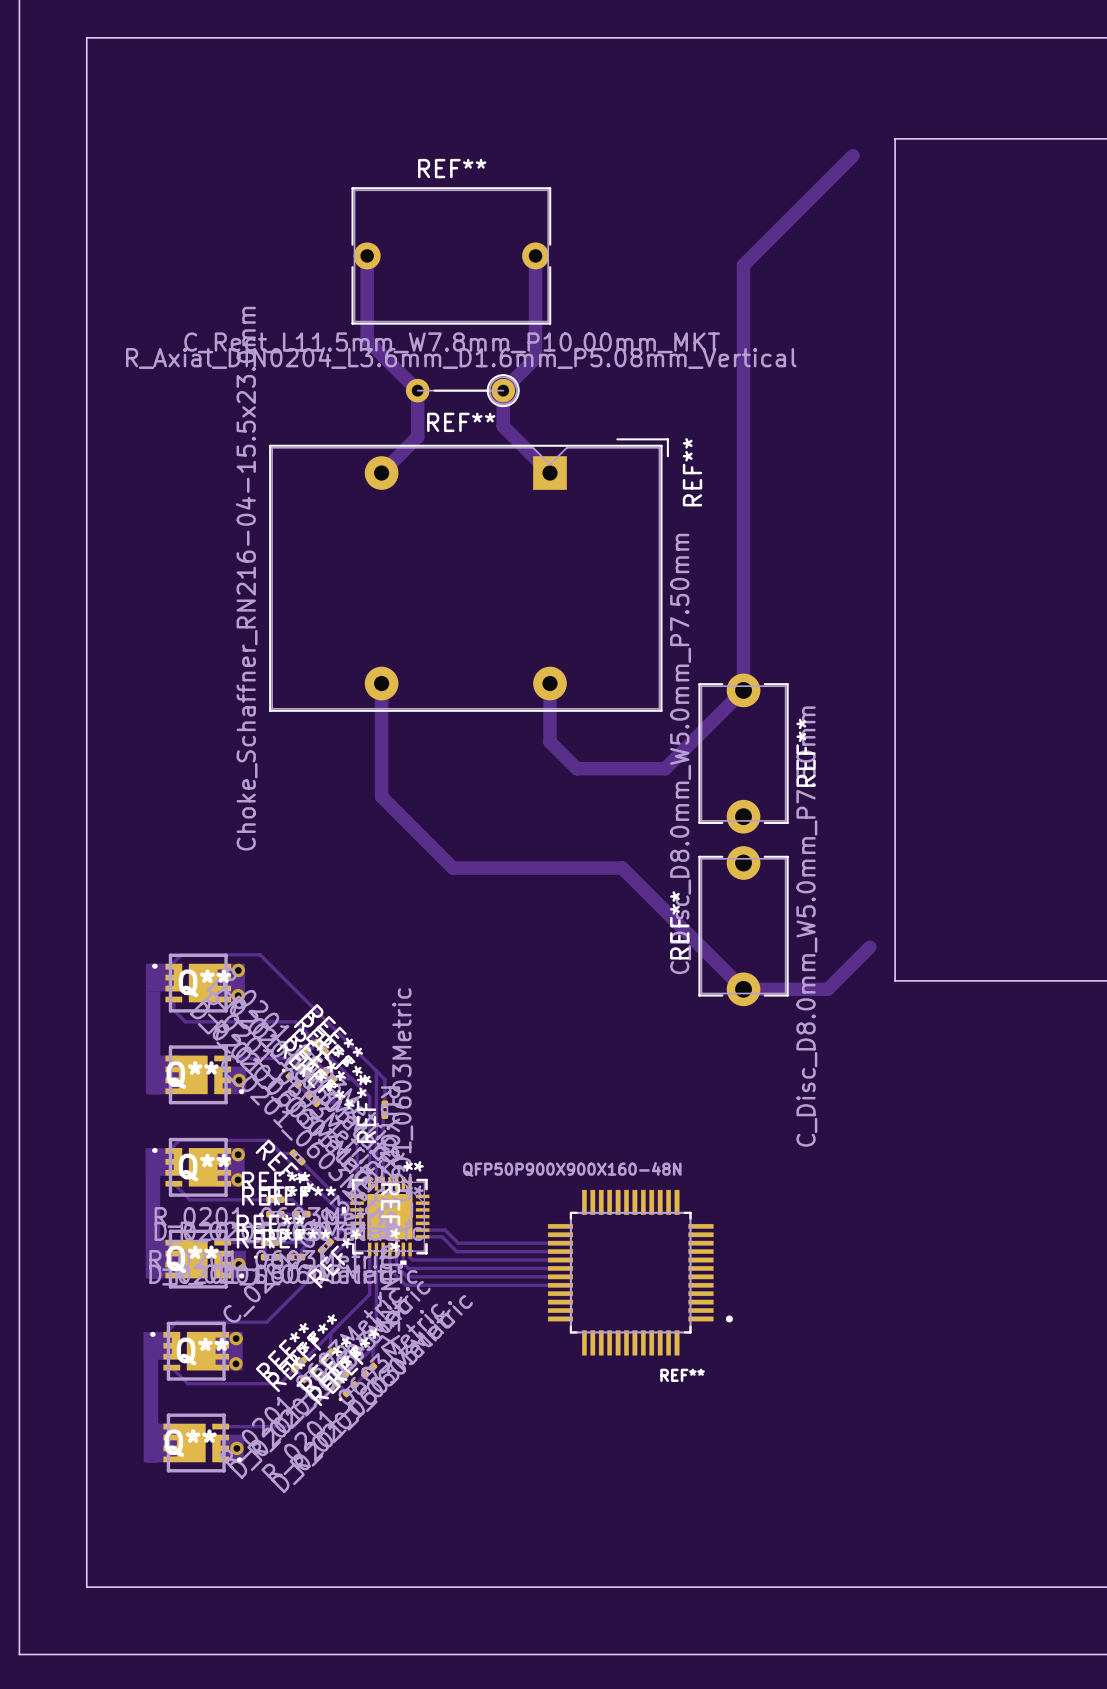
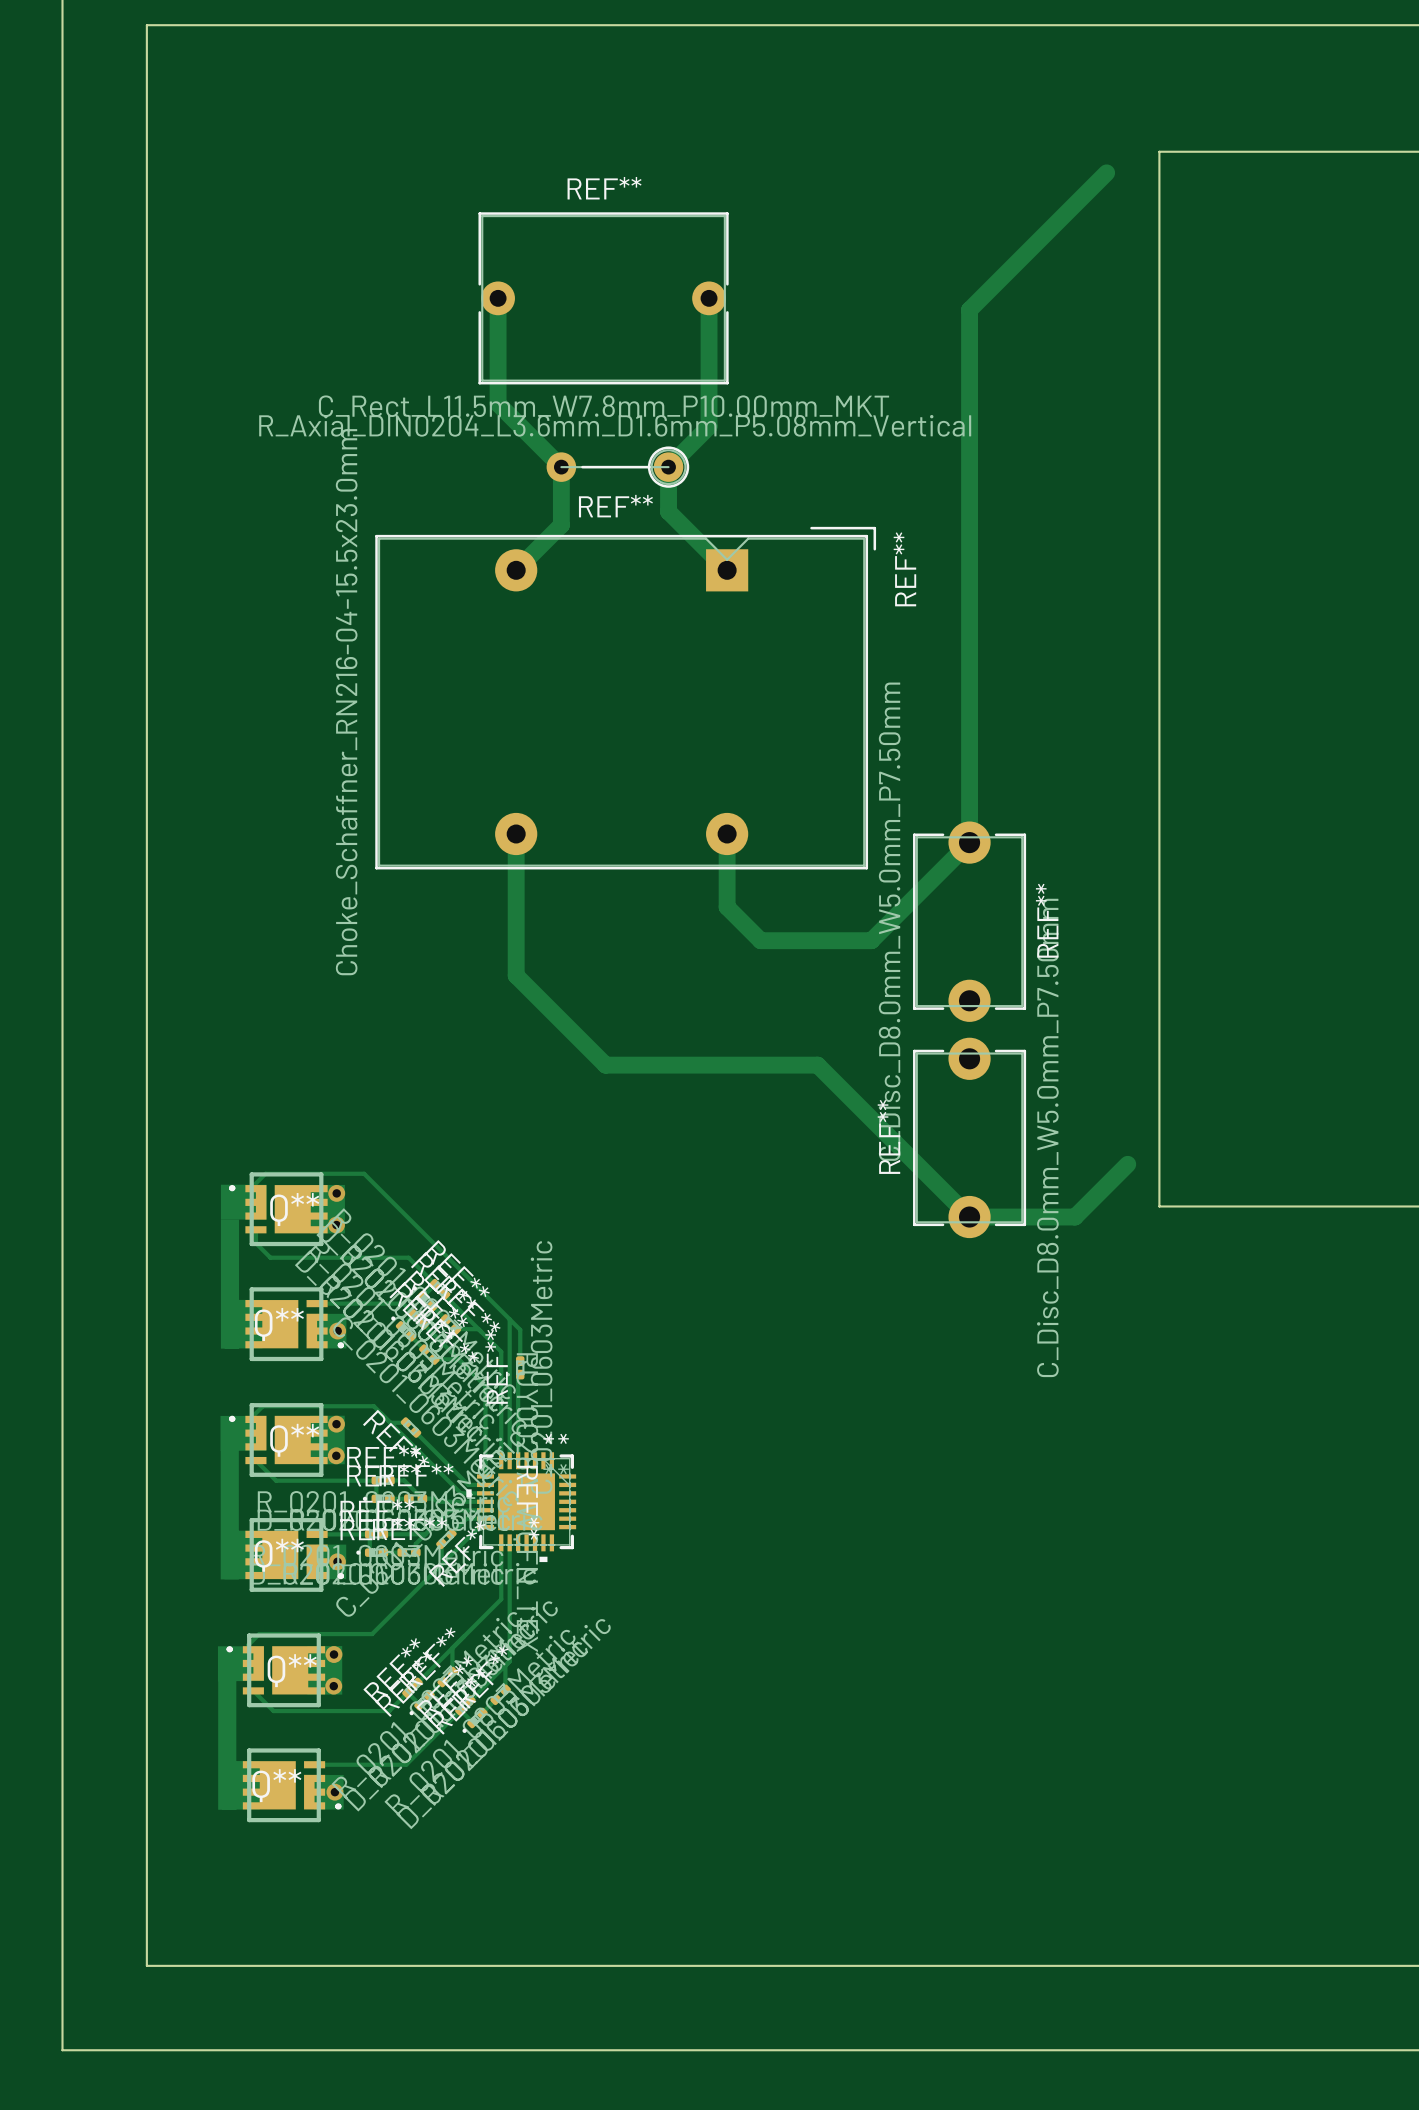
track: (422, 1230) (445, 1230) (458, 1243) (560, 1243) -> none
track: (422, 1236) (442, 1236) (456, 1251) (560, 1251) -> none
track: (389, 1249) (389, 1269) (405, 1285) (560, 1285) -> none
track: (396, 1249) (396, 1266) (407, 1276) (560, 1276) -> none
track: (403, 1249) (403, 1263) (408, 1268) (560, 1268) -> none
track: (410, 1249) (410, 1257) (412, 1260) (560, 1260) -> none
REF**: QFP50P900X900X160-48N (640, 1272) -> none

